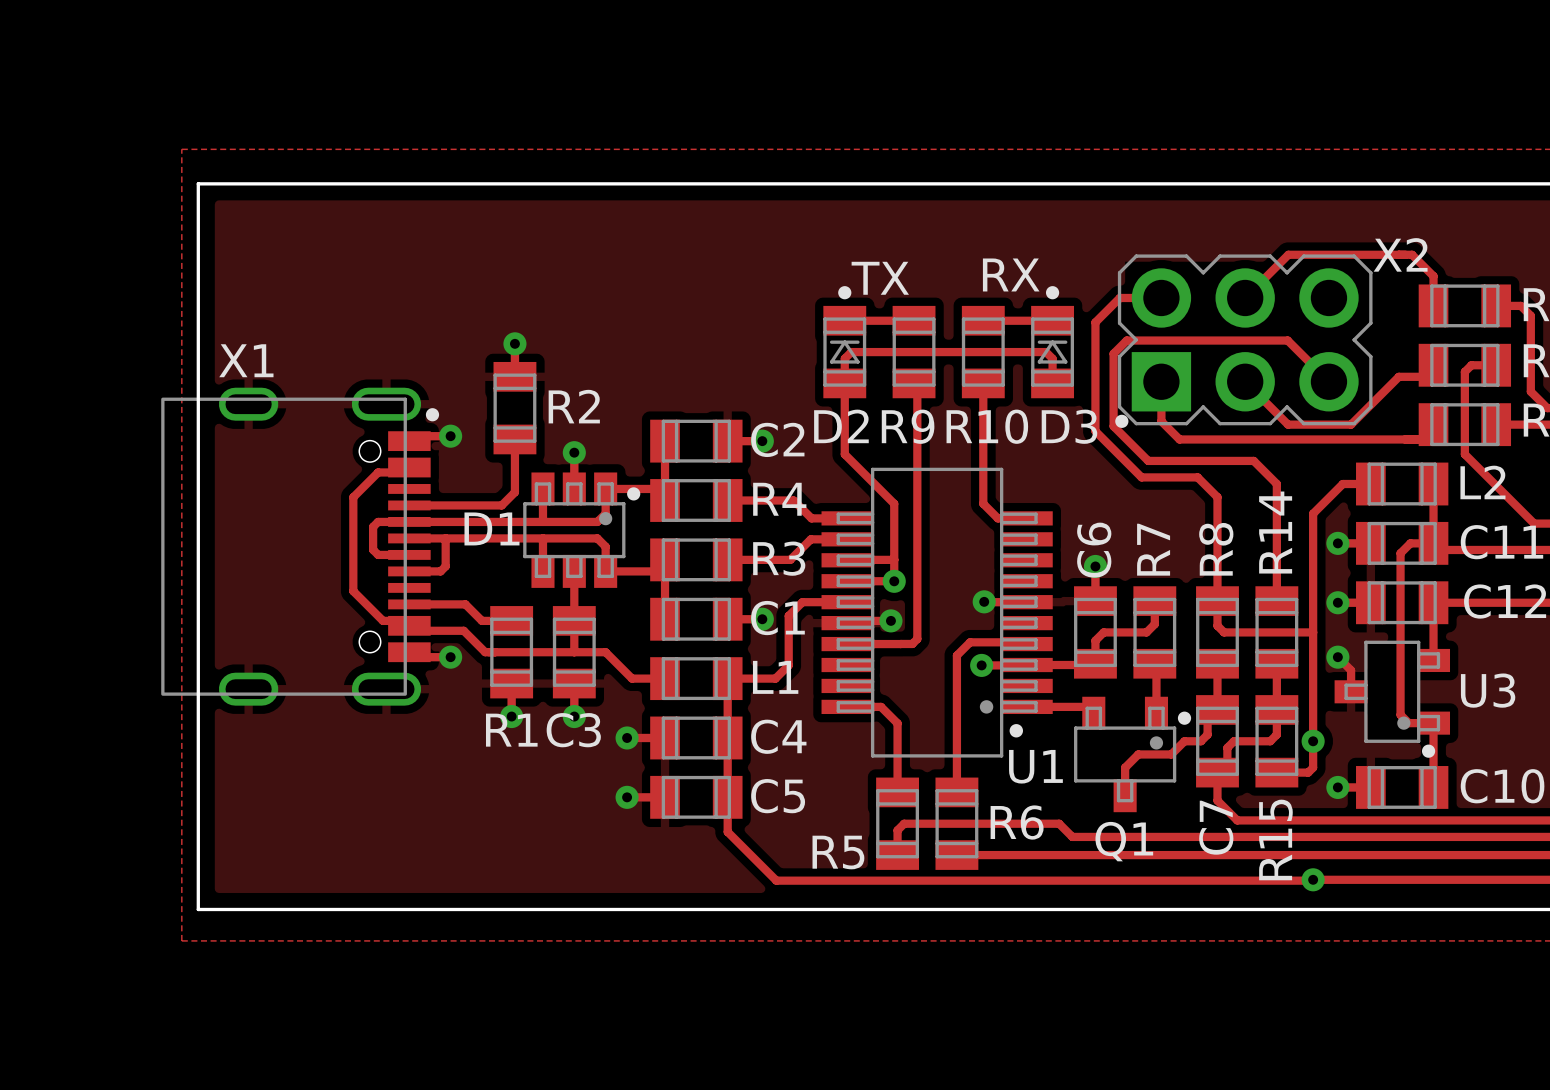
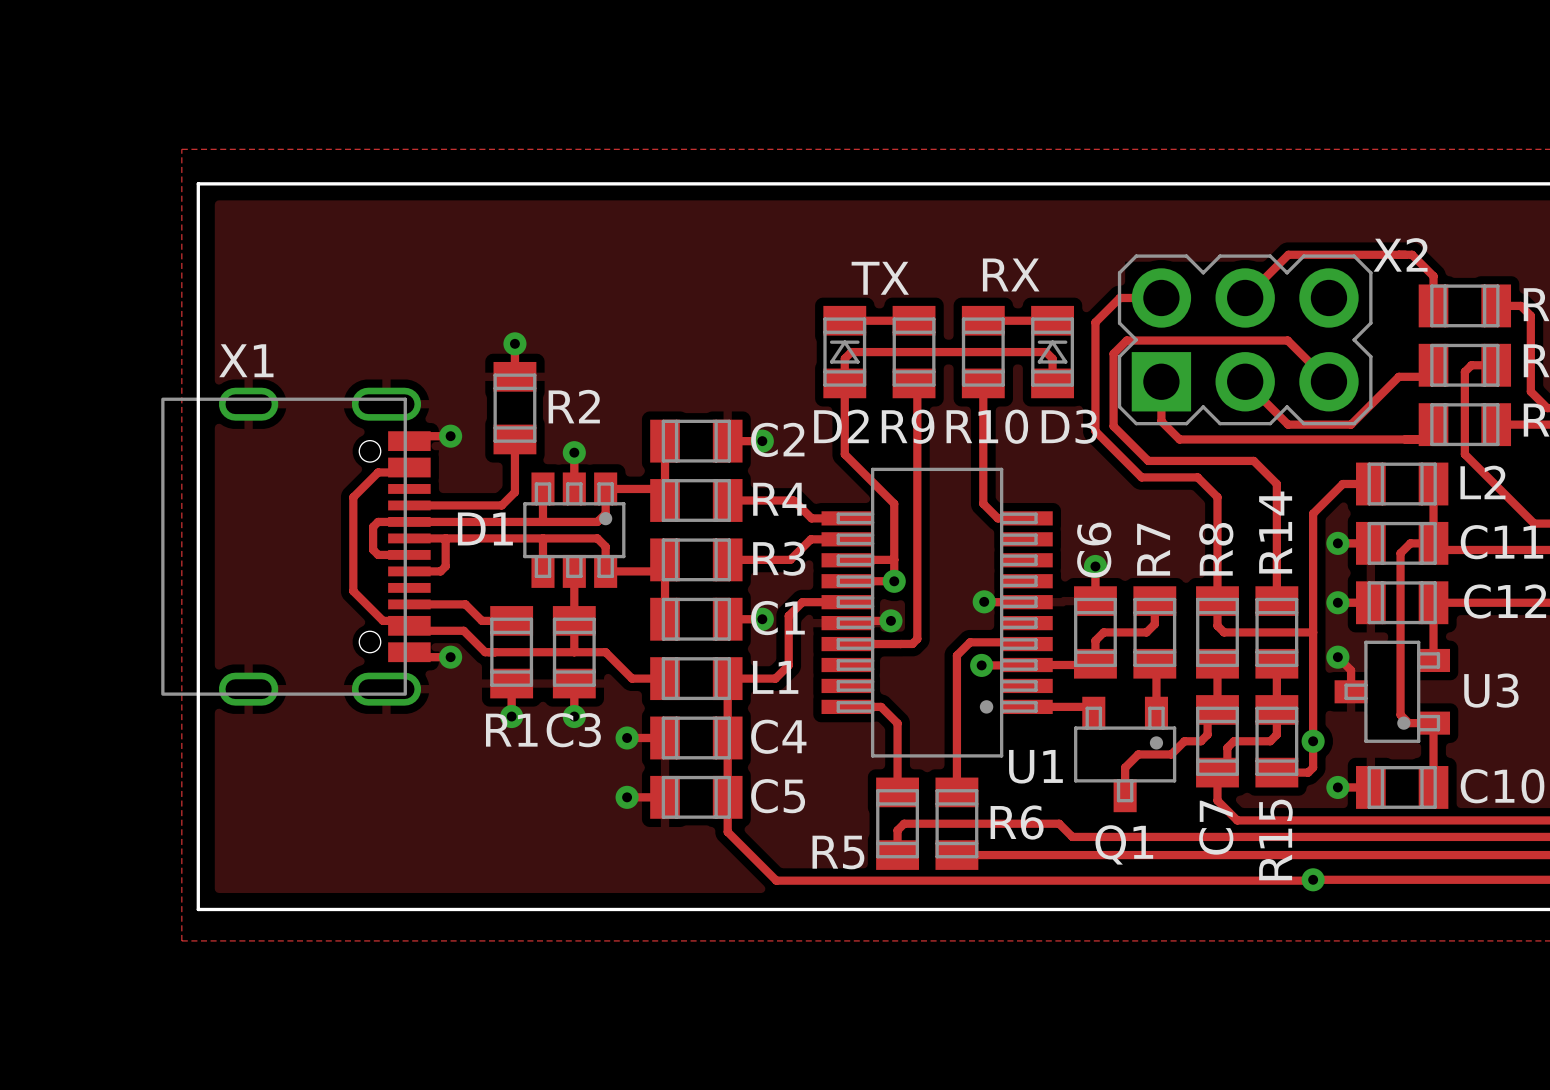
X2 footprint: [1115, 254, 1373, 428] -> [1117, 254, 1373, 426]
D2 footprint: [823, 286, 867, 399] -> [823, 305, 867, 399]
D3 footprint: [1031, 286, 1075, 399] -> [1031, 305, 1075, 399]
X1 footprint: [161, 387, 440, 706] -> [161, 387, 431, 706]
U1 footprint: [821, 467, 1053, 758] -> [821, 467, 1053, 758]
D1 footprint: [523, 472, 641, 588] -> [523, 472, 626, 588]
U3 footprint: [1334, 640, 1451, 758] -> [1334, 640, 1451, 743]
Q1 footprint: [1074, 696, 1192, 813] -> [1074, 696, 1177, 813]

